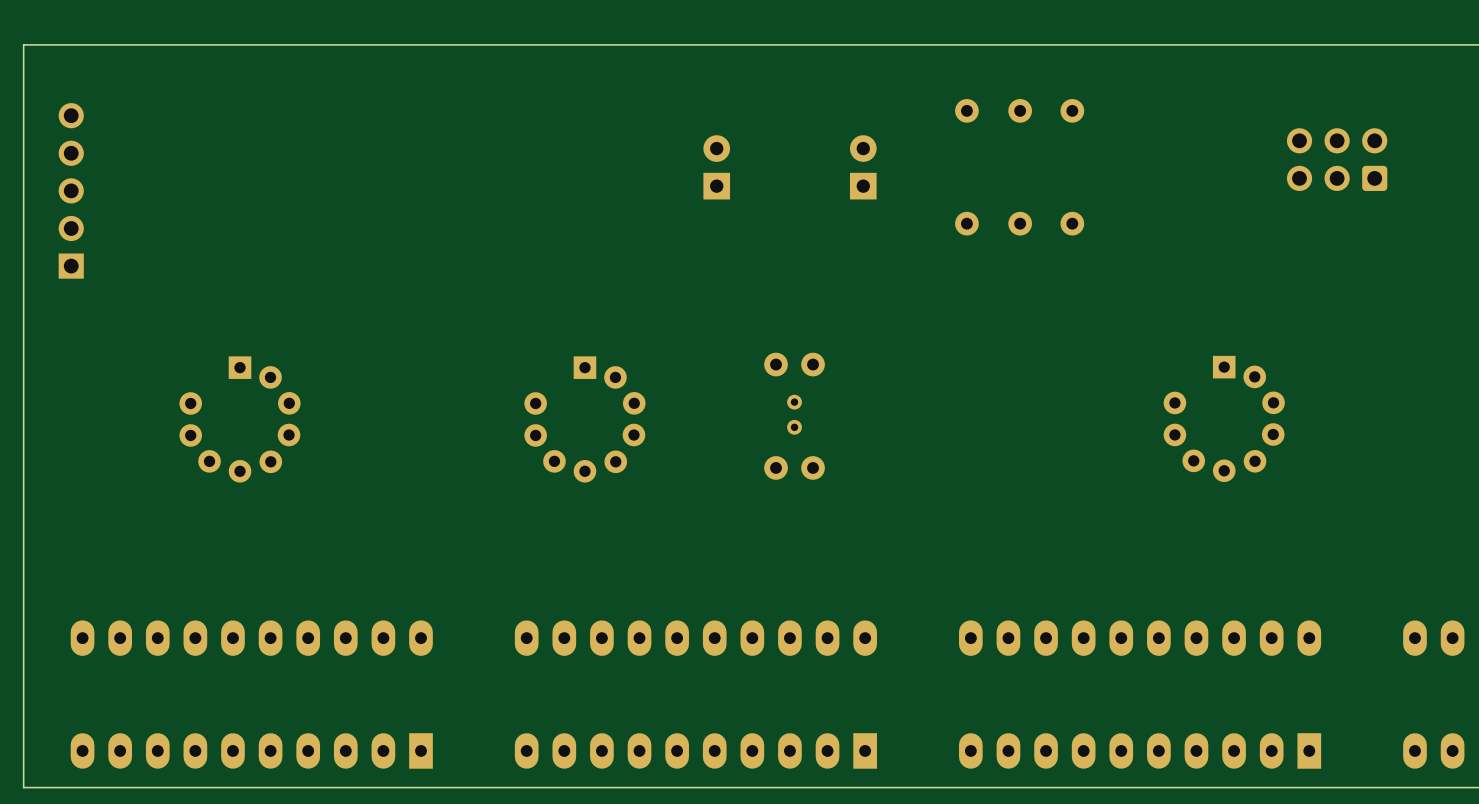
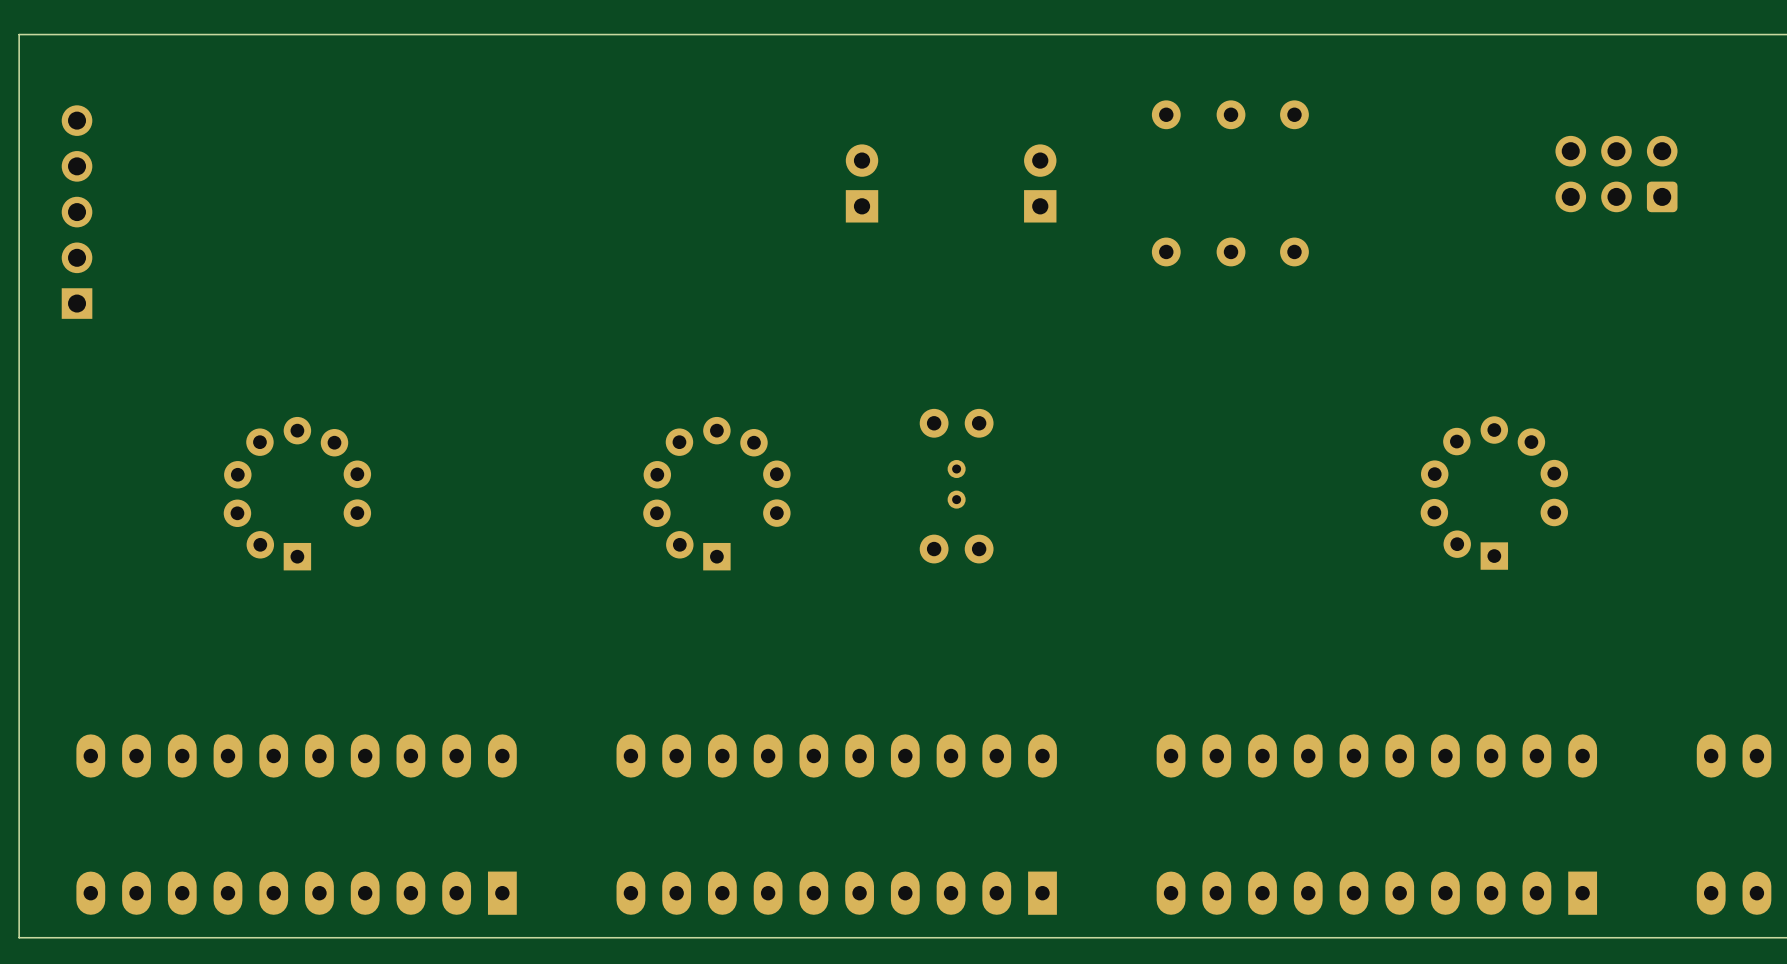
part rotation: 0° (1224, 418) -> 180° (1494, 493)
part rotation: 0° (240, 419) -> 180° (297, 493)
part rotation: 0° (584, 419) -> 180° (716, 493)

